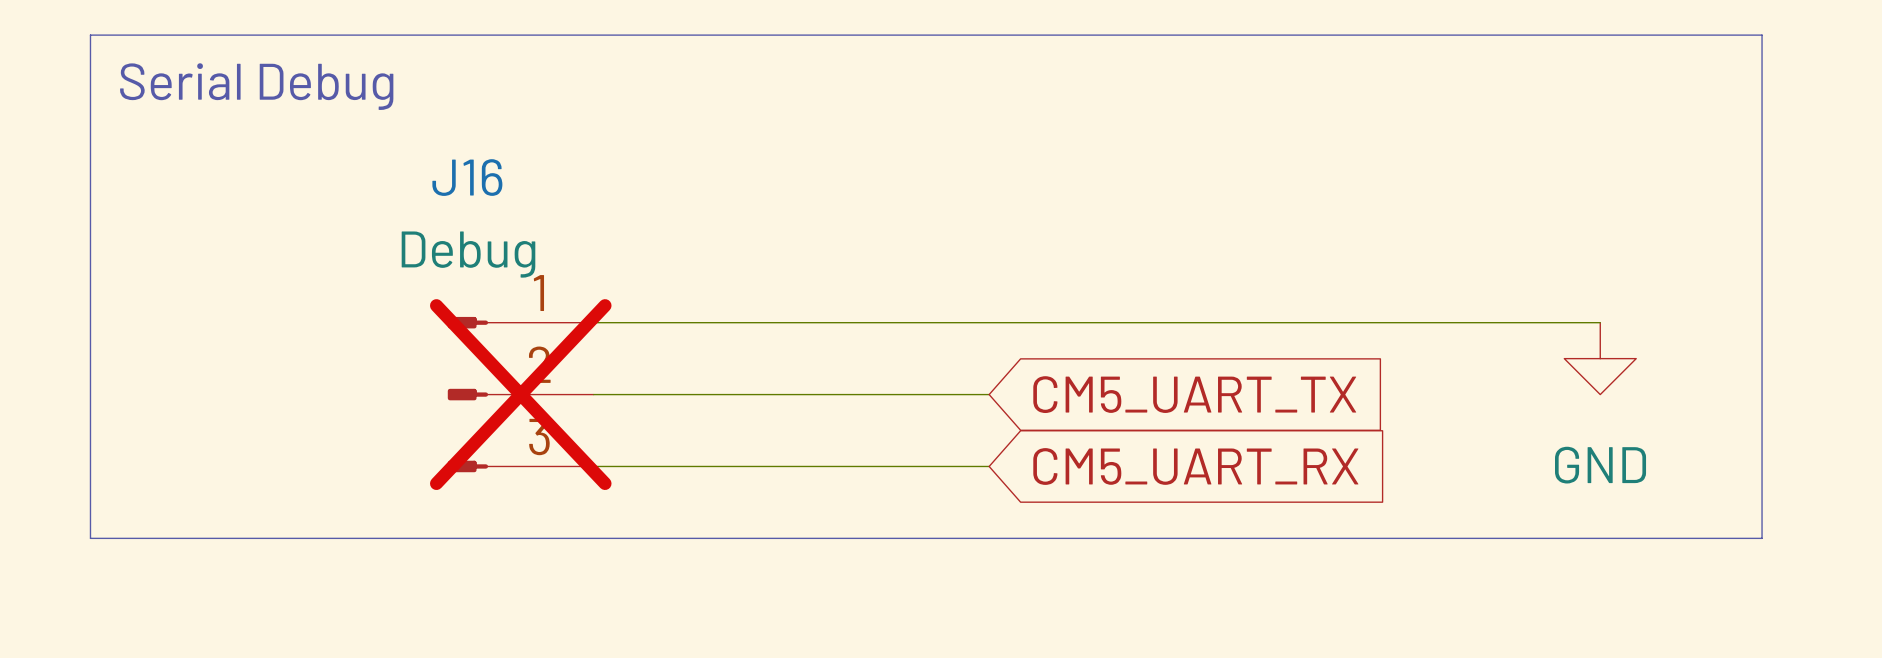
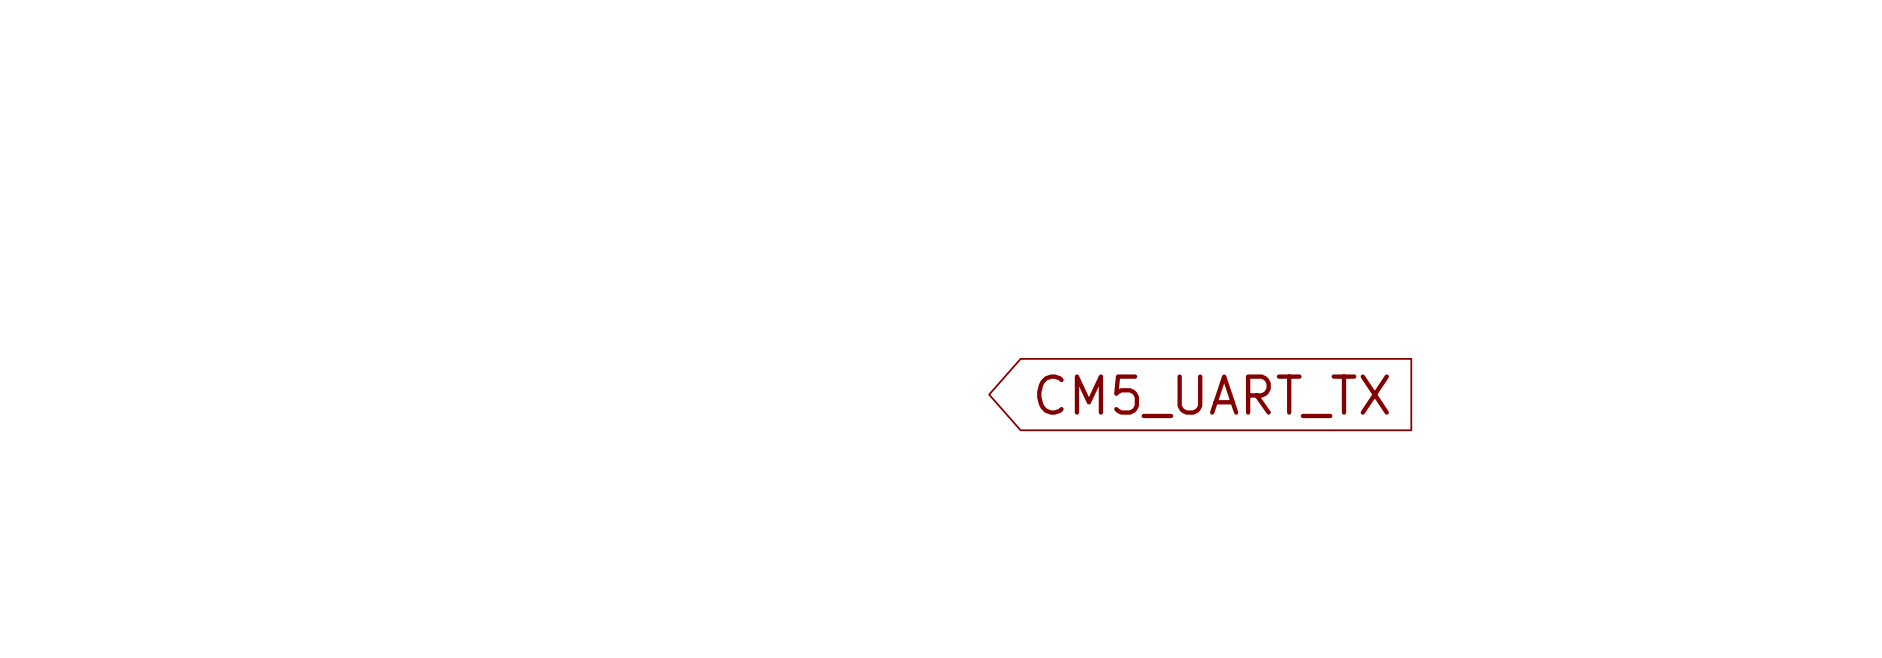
line: (90, 35) (1762, 35) (1762, 538) (90, 538) (90, 35) -> none
text: Serial Debug (256, 86) -> none
wire: (593, 322) (1600, 322) -> none
power symbol: GND (1600, 358) -> none
J16: Debug (520, 394) -> none
wire: (593, 394) (989, 394) -> none
wire: (593, 466) (989, 466) -> none
global label: CM5_UART_RX (1195, 466) -> none

